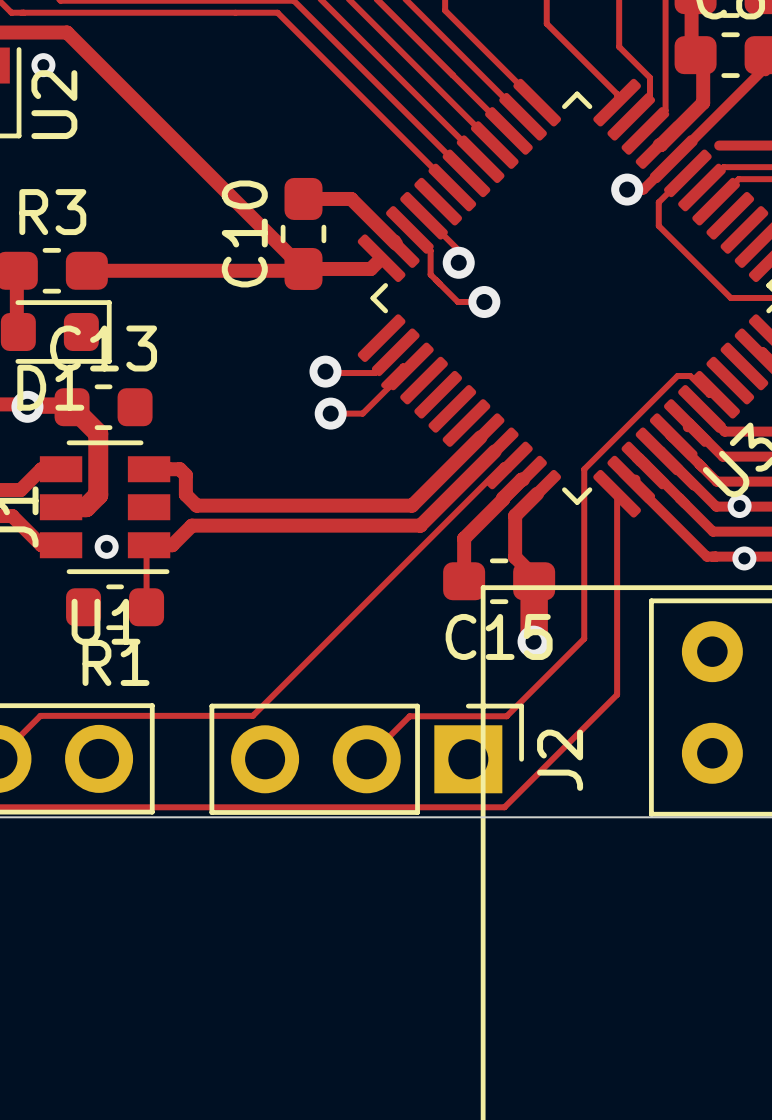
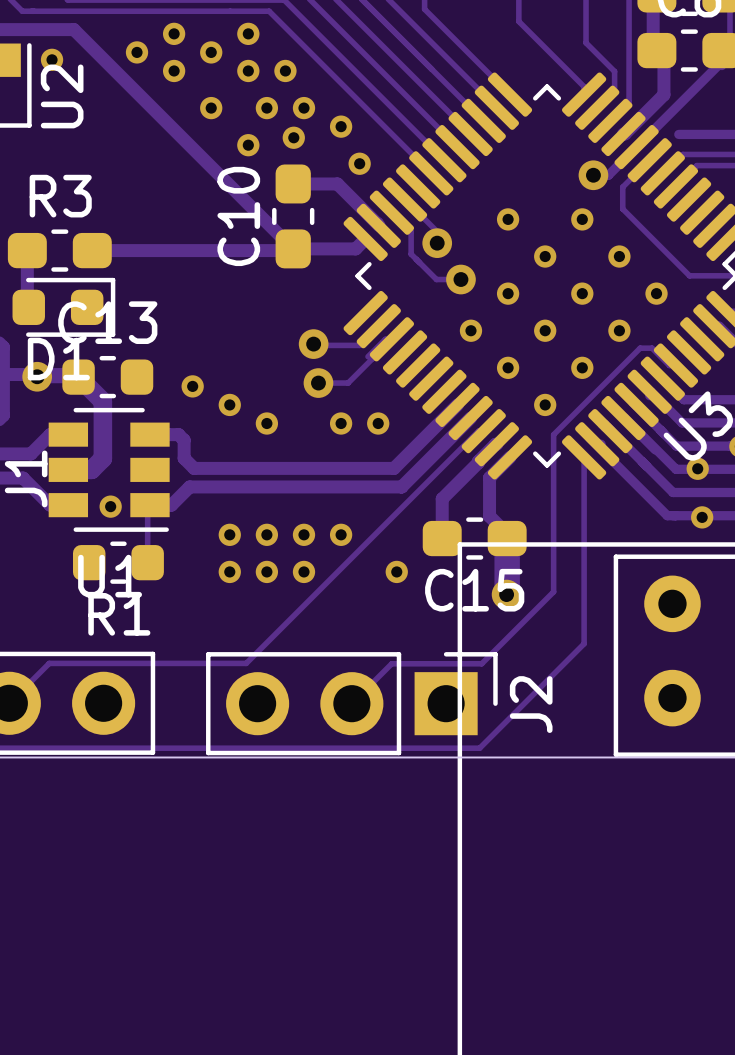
via: none -> (174, 33)
via: none -> (248, 33)
via: none -> (137, 52)
via: none -> (211, 52)
via: none -> (174, 70)
via: none -> (248, 70)
via: none -> (285, 70)
via: none -> (211, 108)
via: none -> (266, 108)
via: none -> (303, 108)
via: none -> (341, 126)
via: none -> (293, 137)
via: none -> (248, 145)
via: none -> (359, 163)
via: none -> (508, 219)
via: none -> (582, 219)
via: none -> (545, 256)
via: none -> (619, 256)
via: none -> (508, 293)
via: none -> (582, 293)
via: none -> (656, 293)
via: none -> (470, 330)
via: none -> (545, 330)
via: none -> (619, 330)
via: none -> (508, 367)
via: none -> (582, 367)
via: none -> (192, 386)
via: none -> (229, 404)
via: none -> (545, 404)
via: none -> (266, 423)
via: none -> (341, 423)
via: none -> (378, 423)
via: none -> (229, 534)
via: none -> (266, 534)
via: none -> (303, 534)
via: none -> (341, 534)
via: none -> (229, 571)
via: none -> (266, 571)
via: none -> (303, 571)
via: none -> (396, 571)

